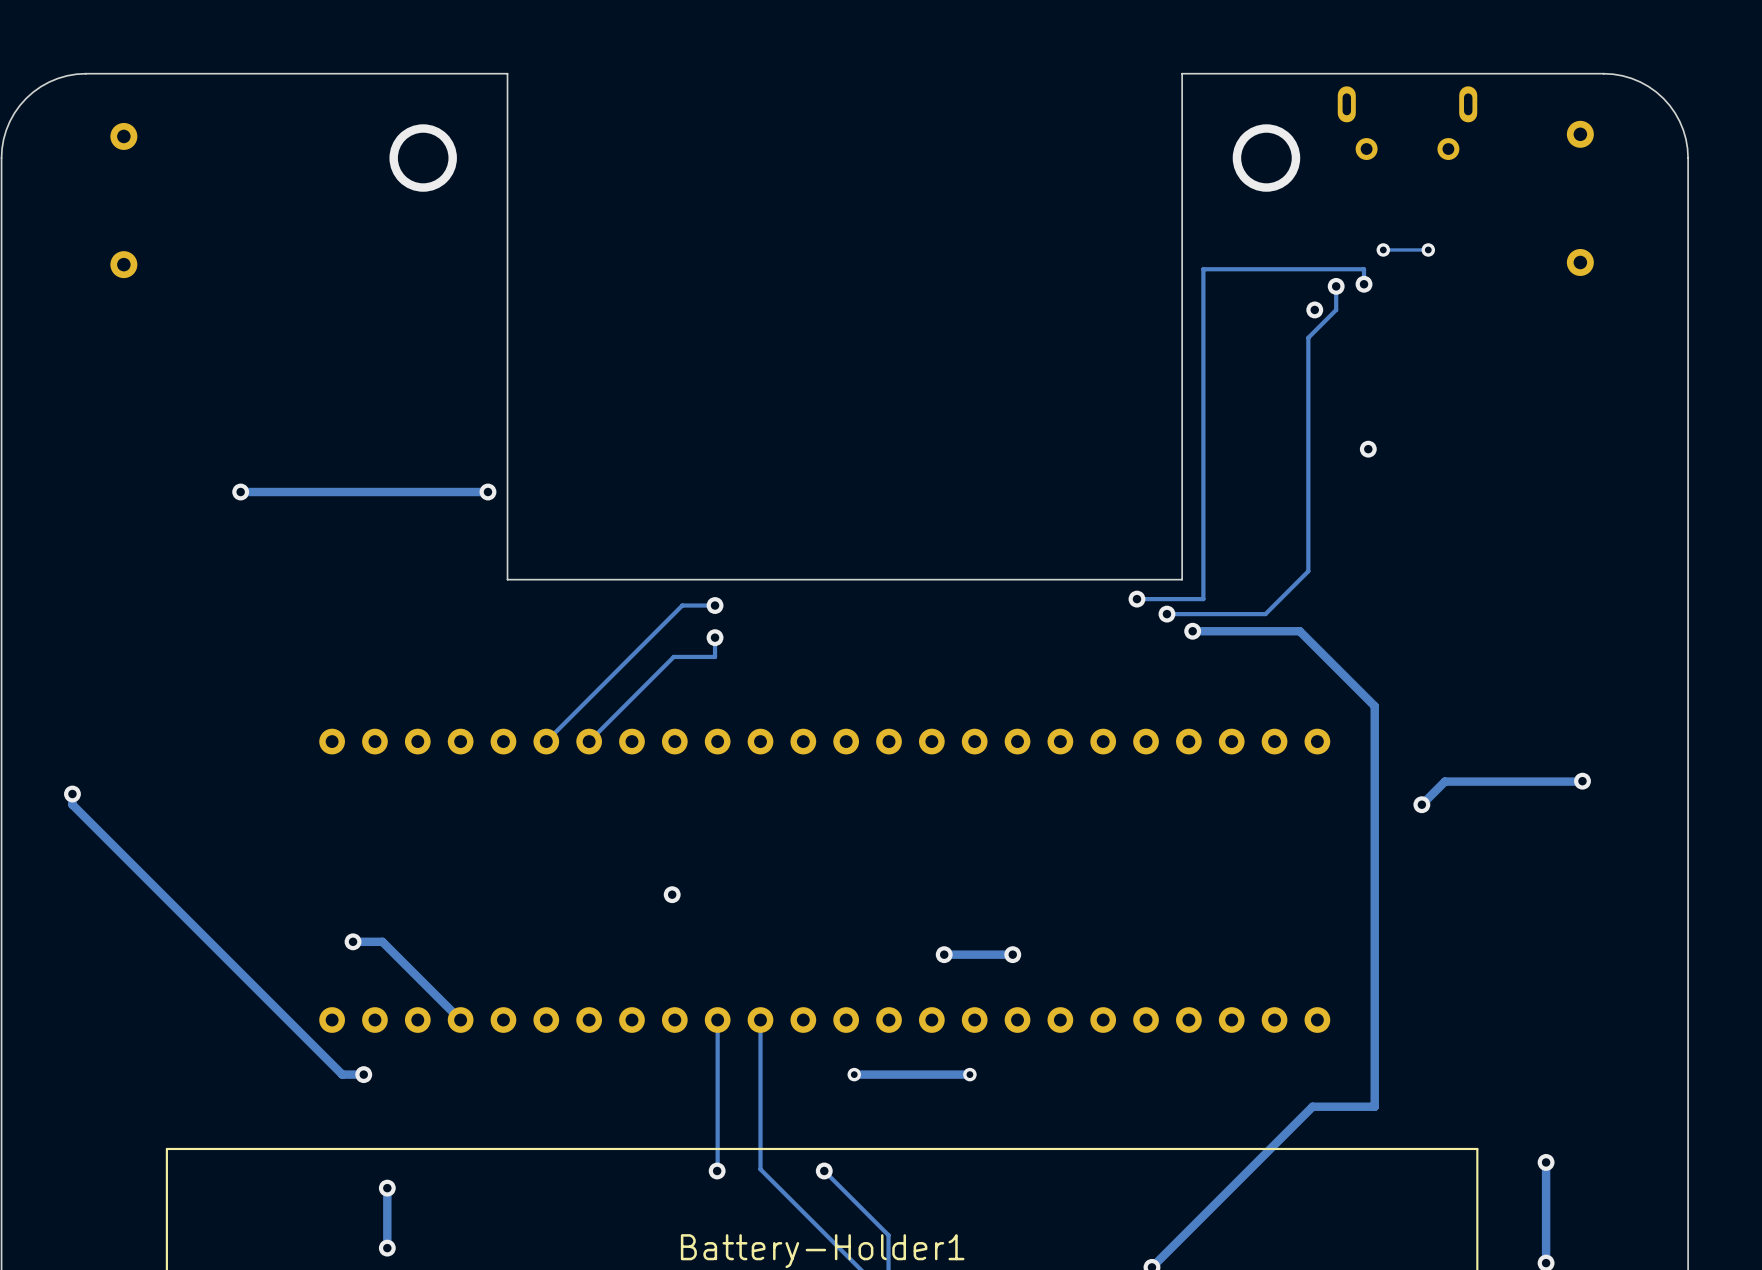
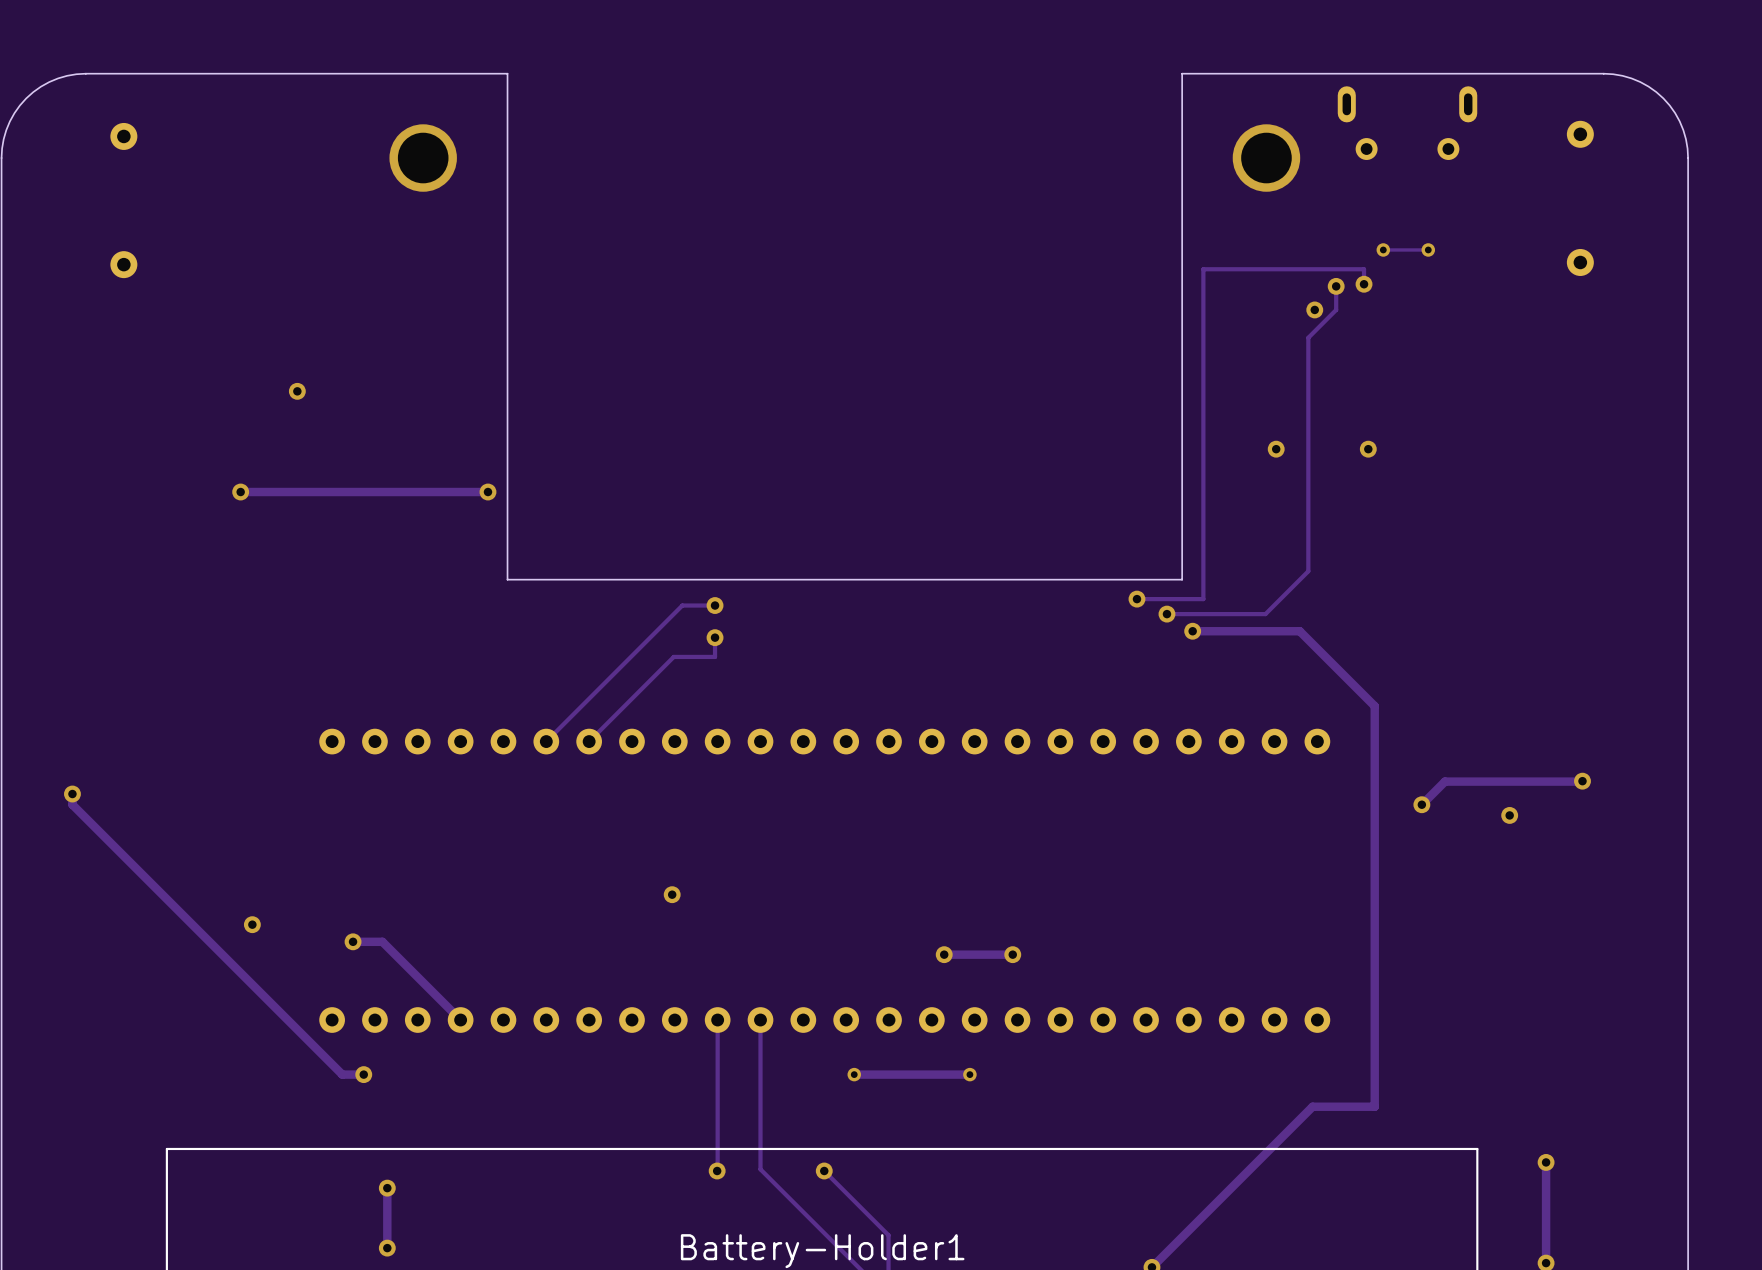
via: none -> (297, 391)
via: none -> (1276, 449)
via: none -> (1509, 815)
via: none -> (252, 924)

